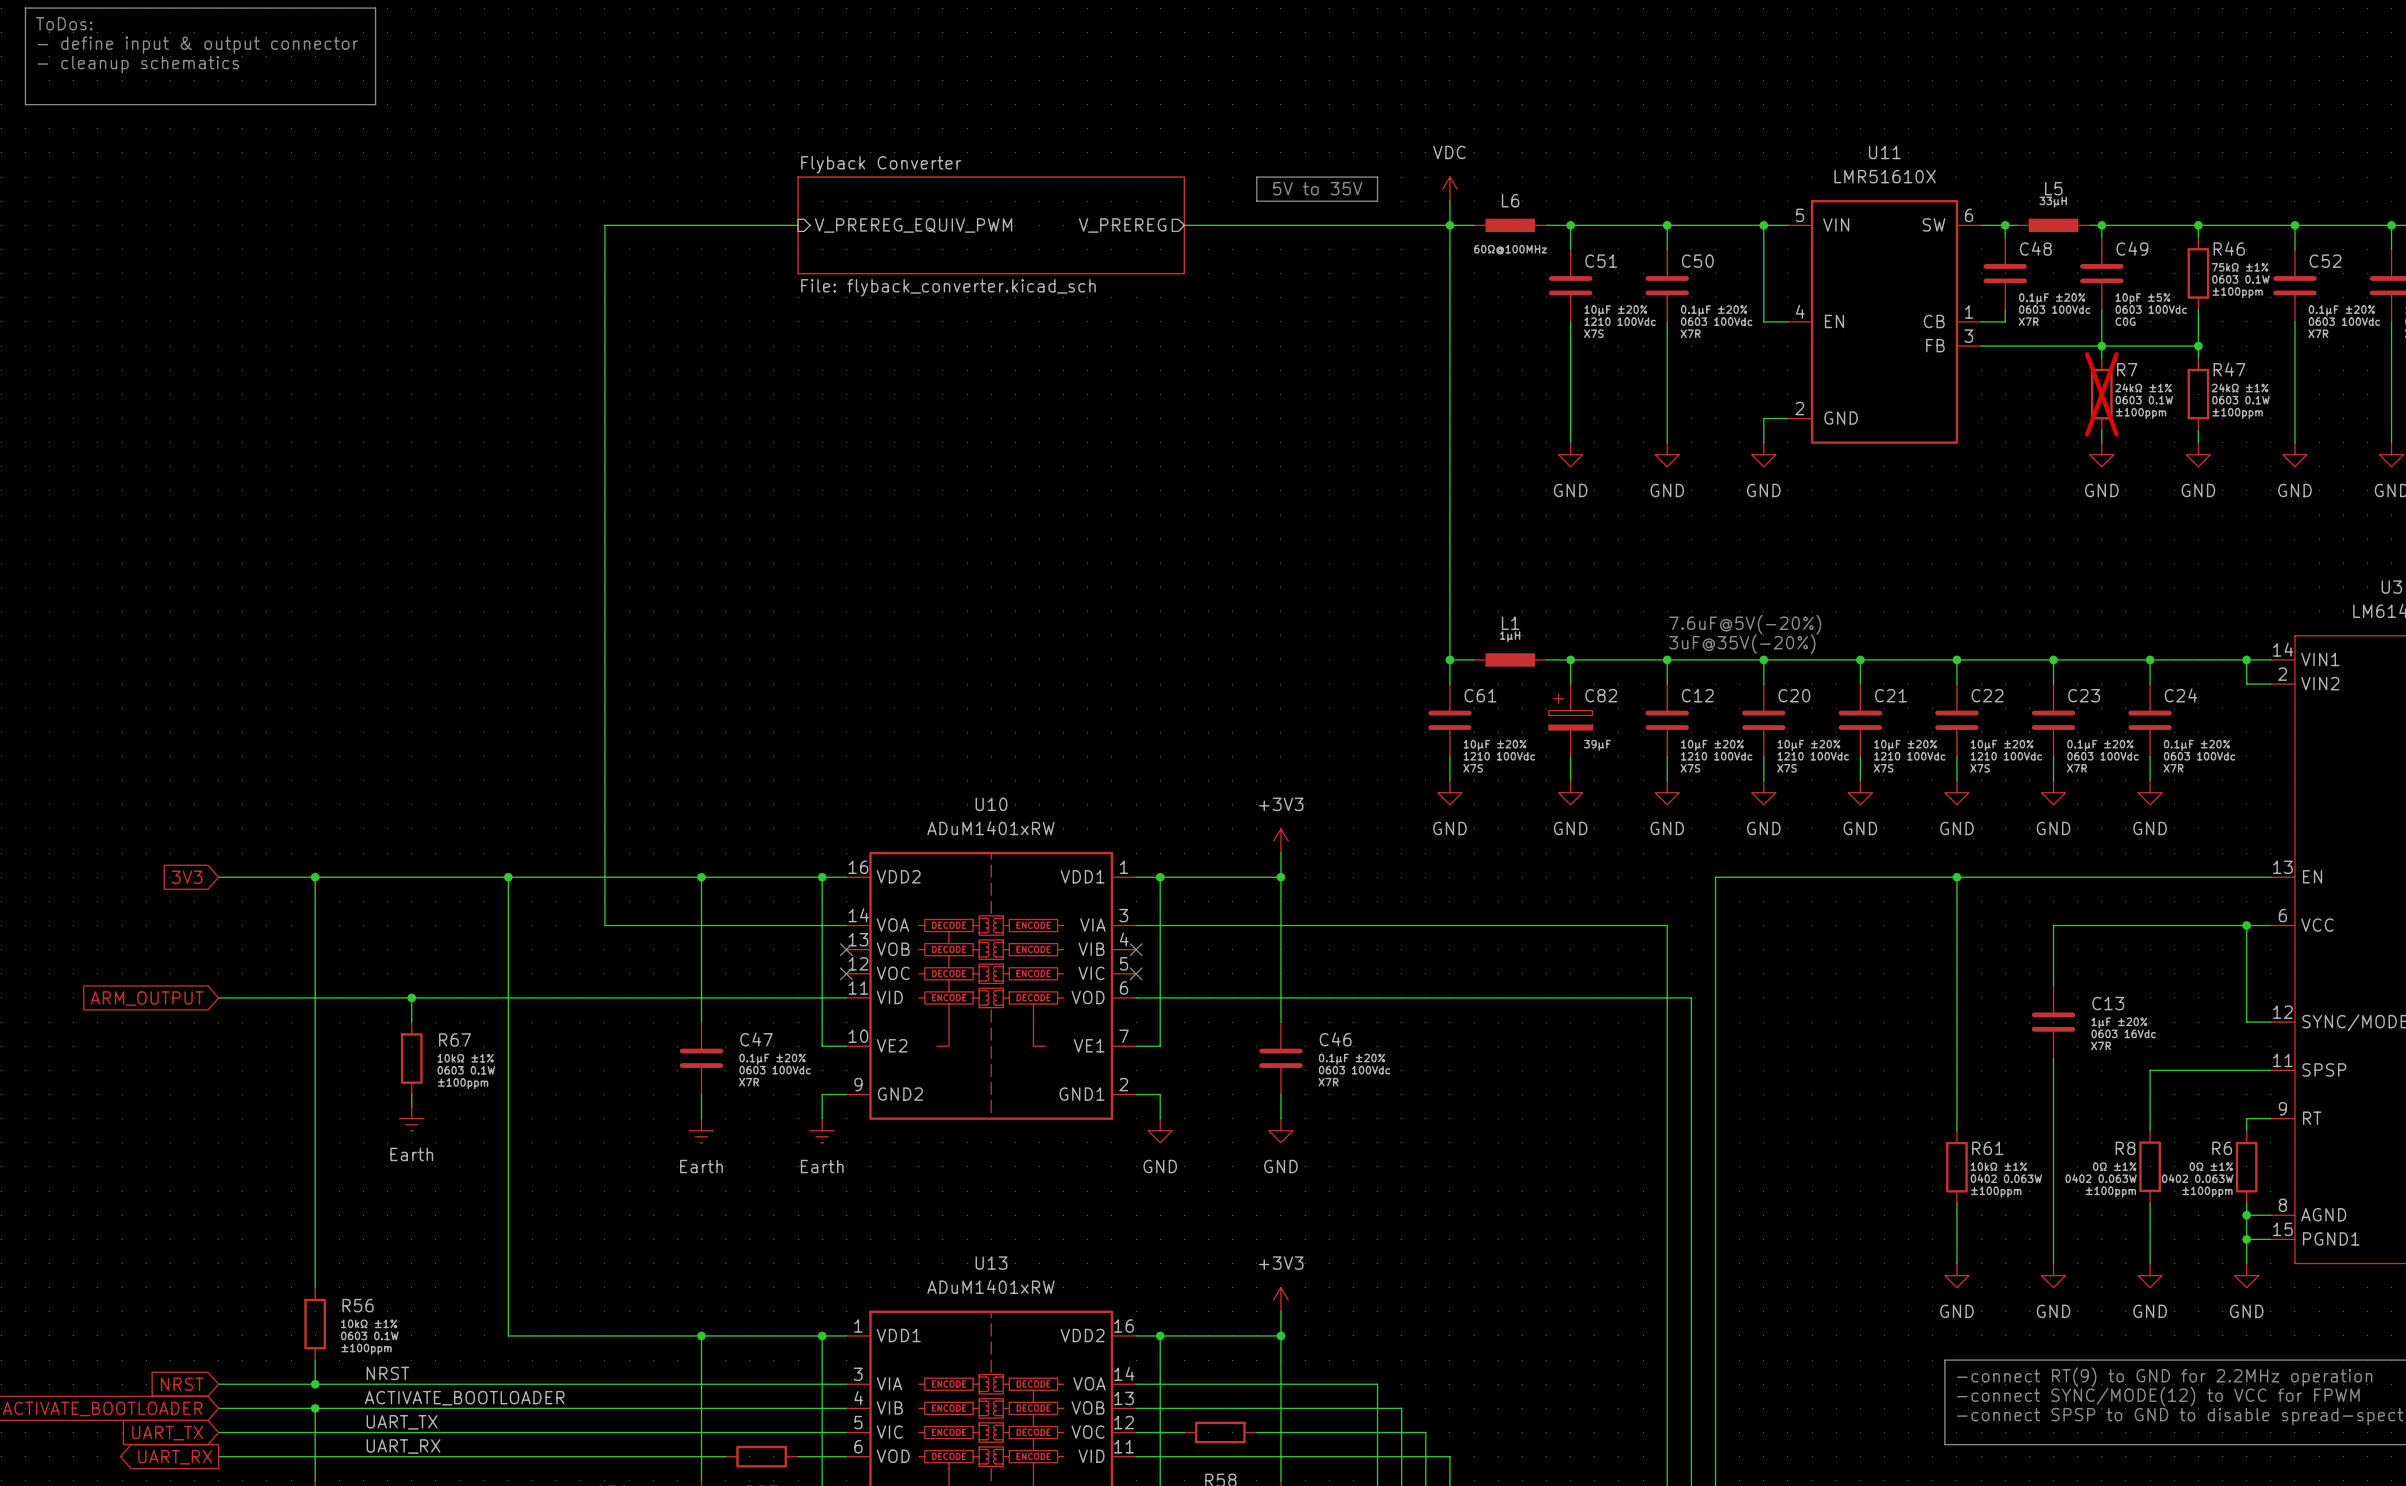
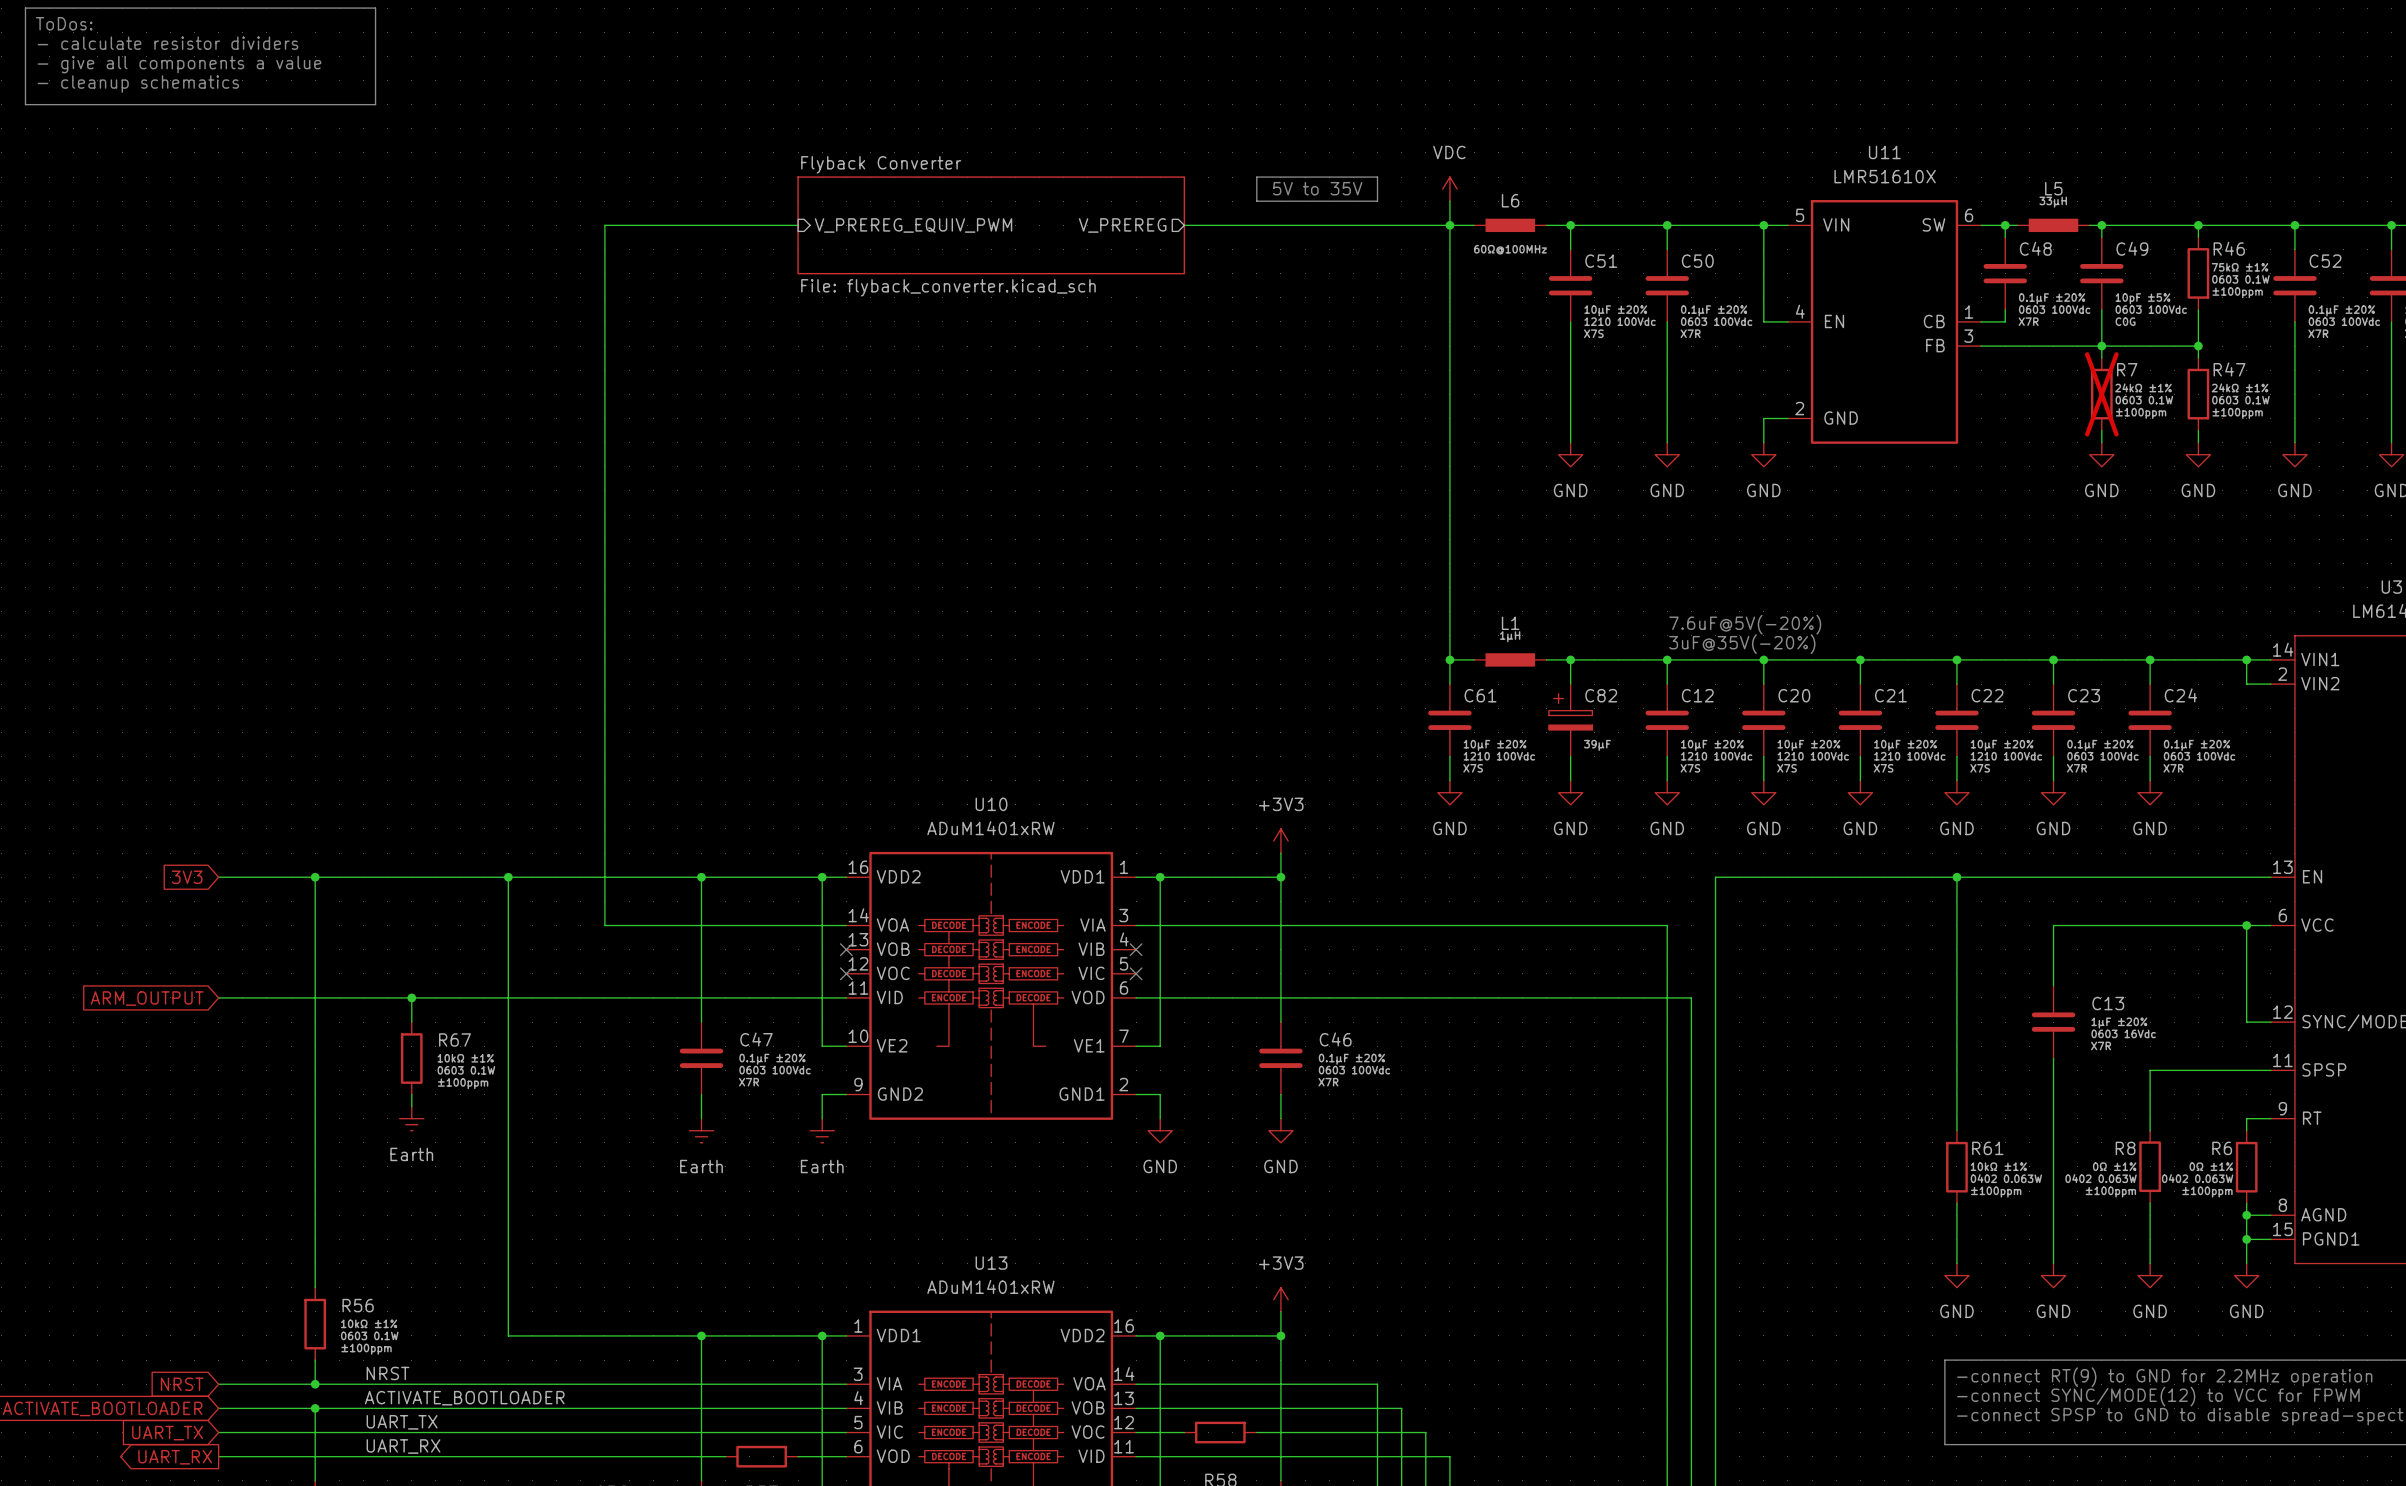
text: - define input & output connector (197, 45) -> - calculate resistor dividers (167, 43)
text: - cleanup schematics (138, 64) -> - give all components a value (179, 64)
text: none -> - cleanup schematics (138, 84)

